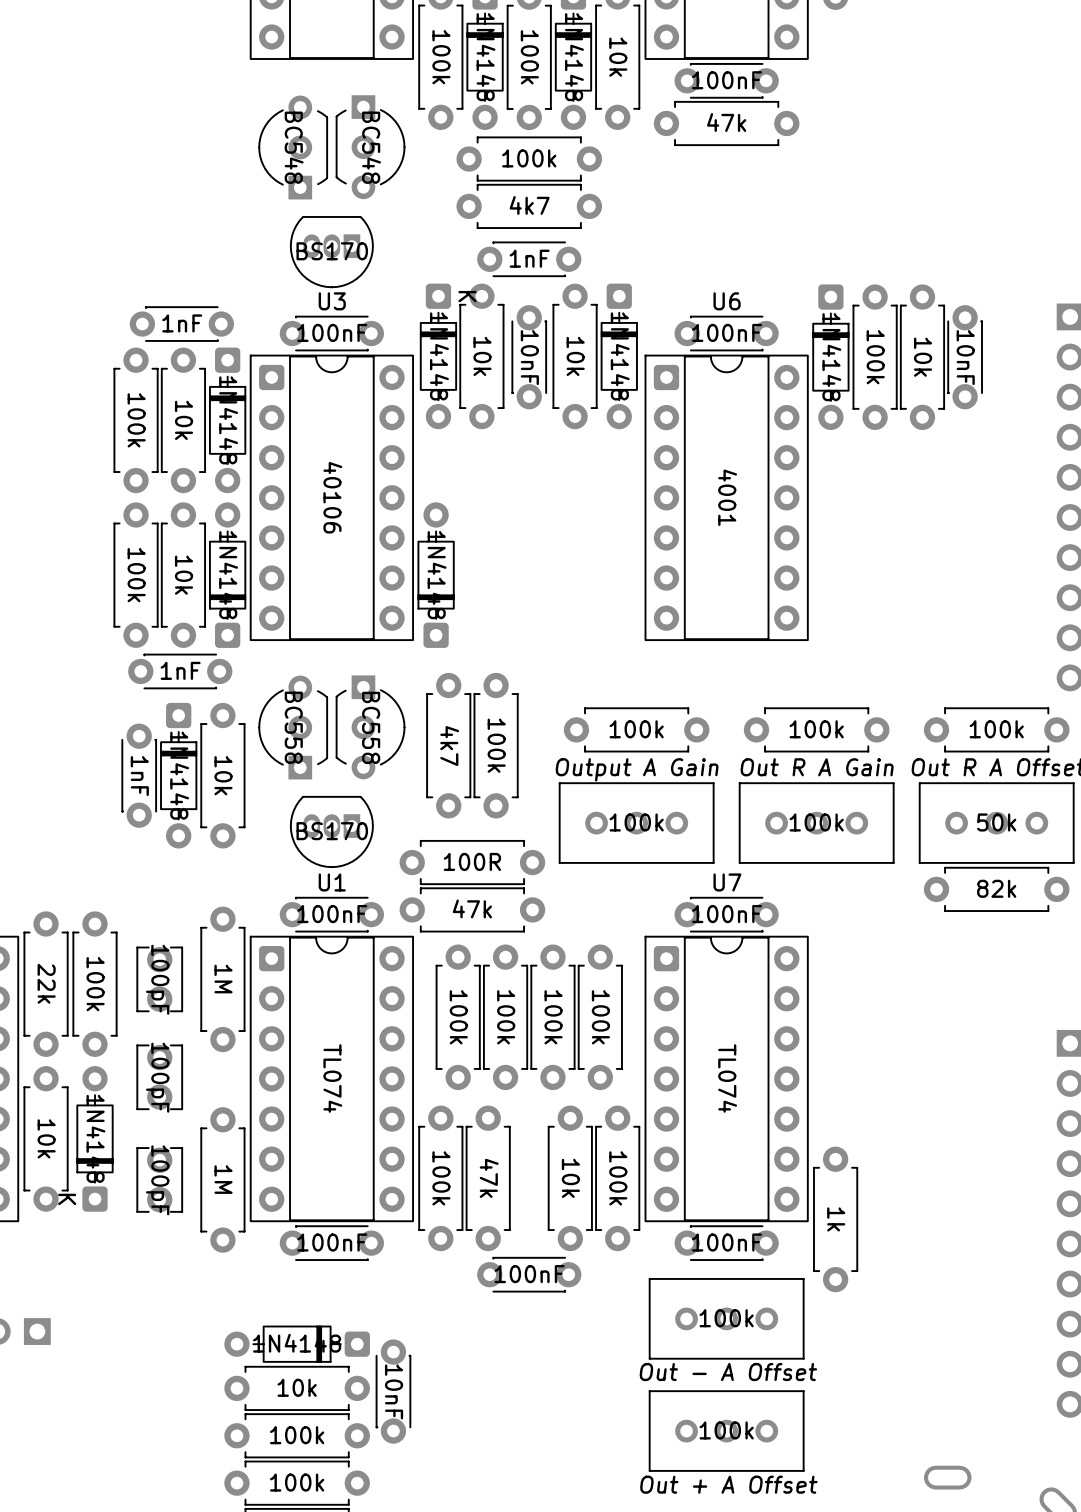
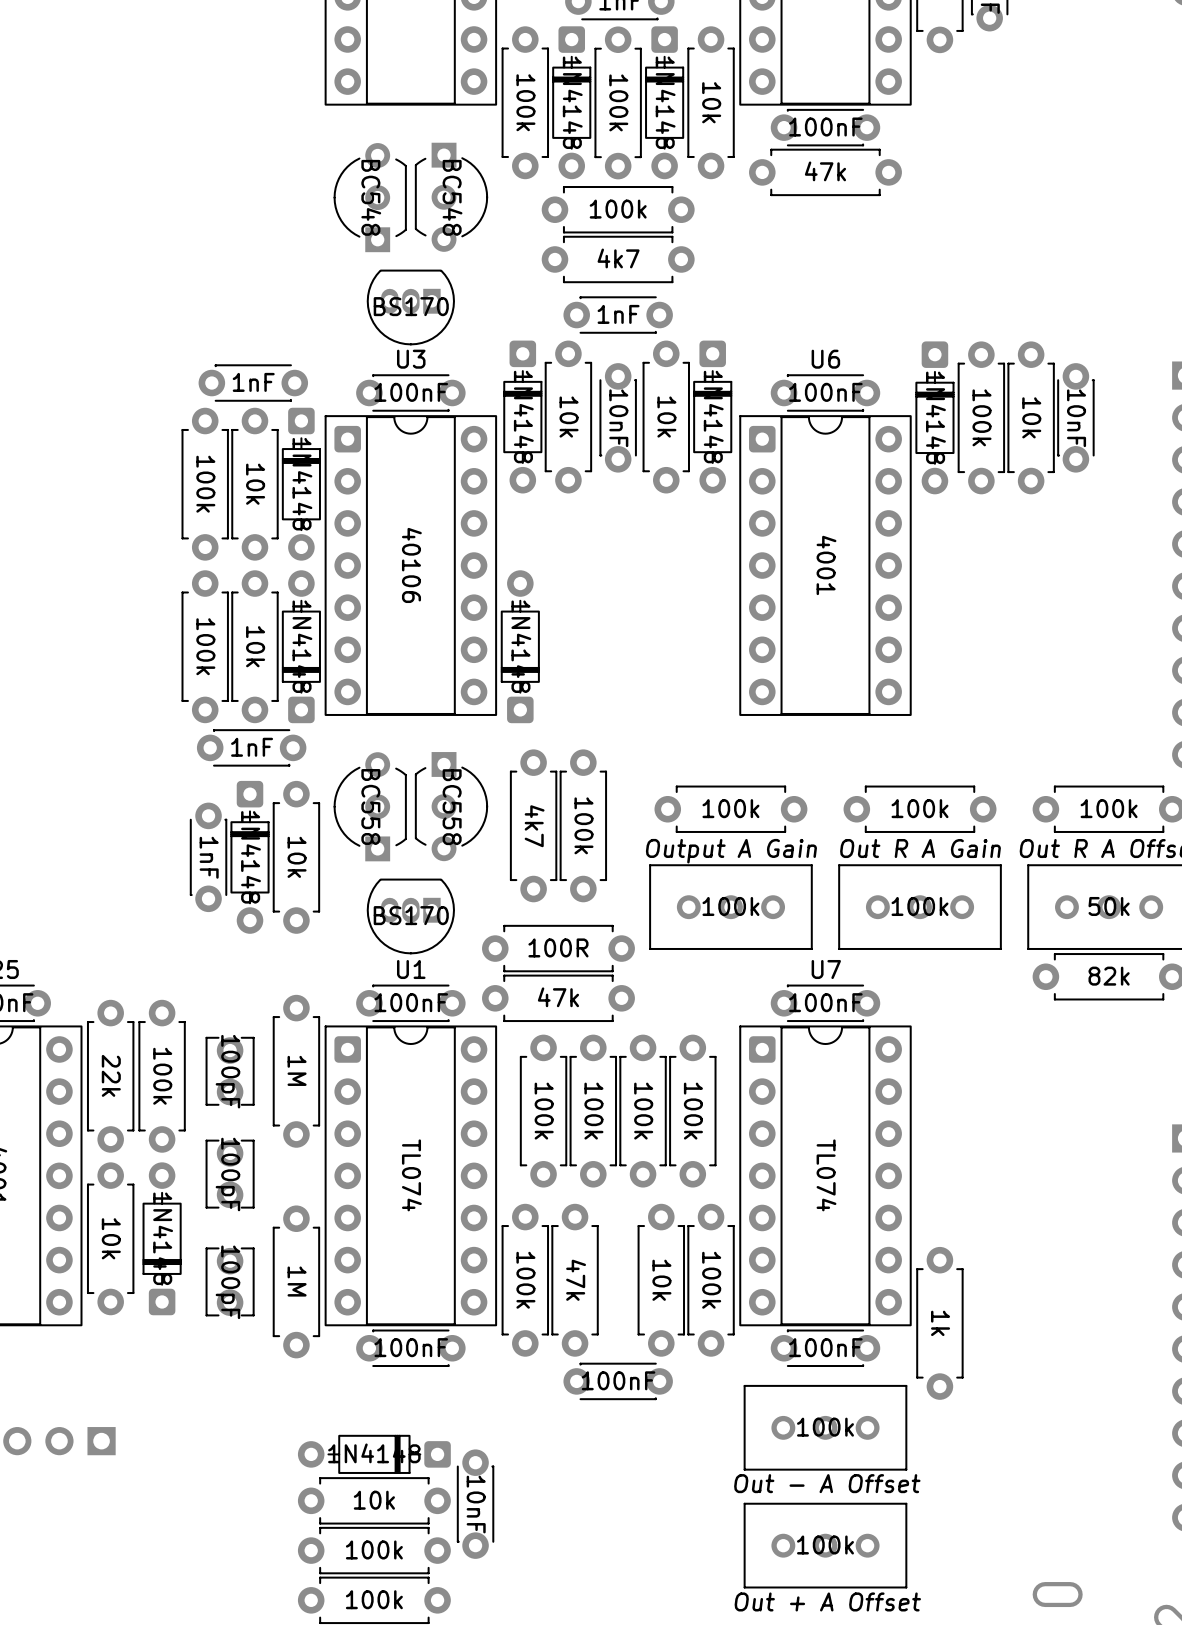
part text: K (467, 296) -> none
part text: K (67, 1199) -> none

